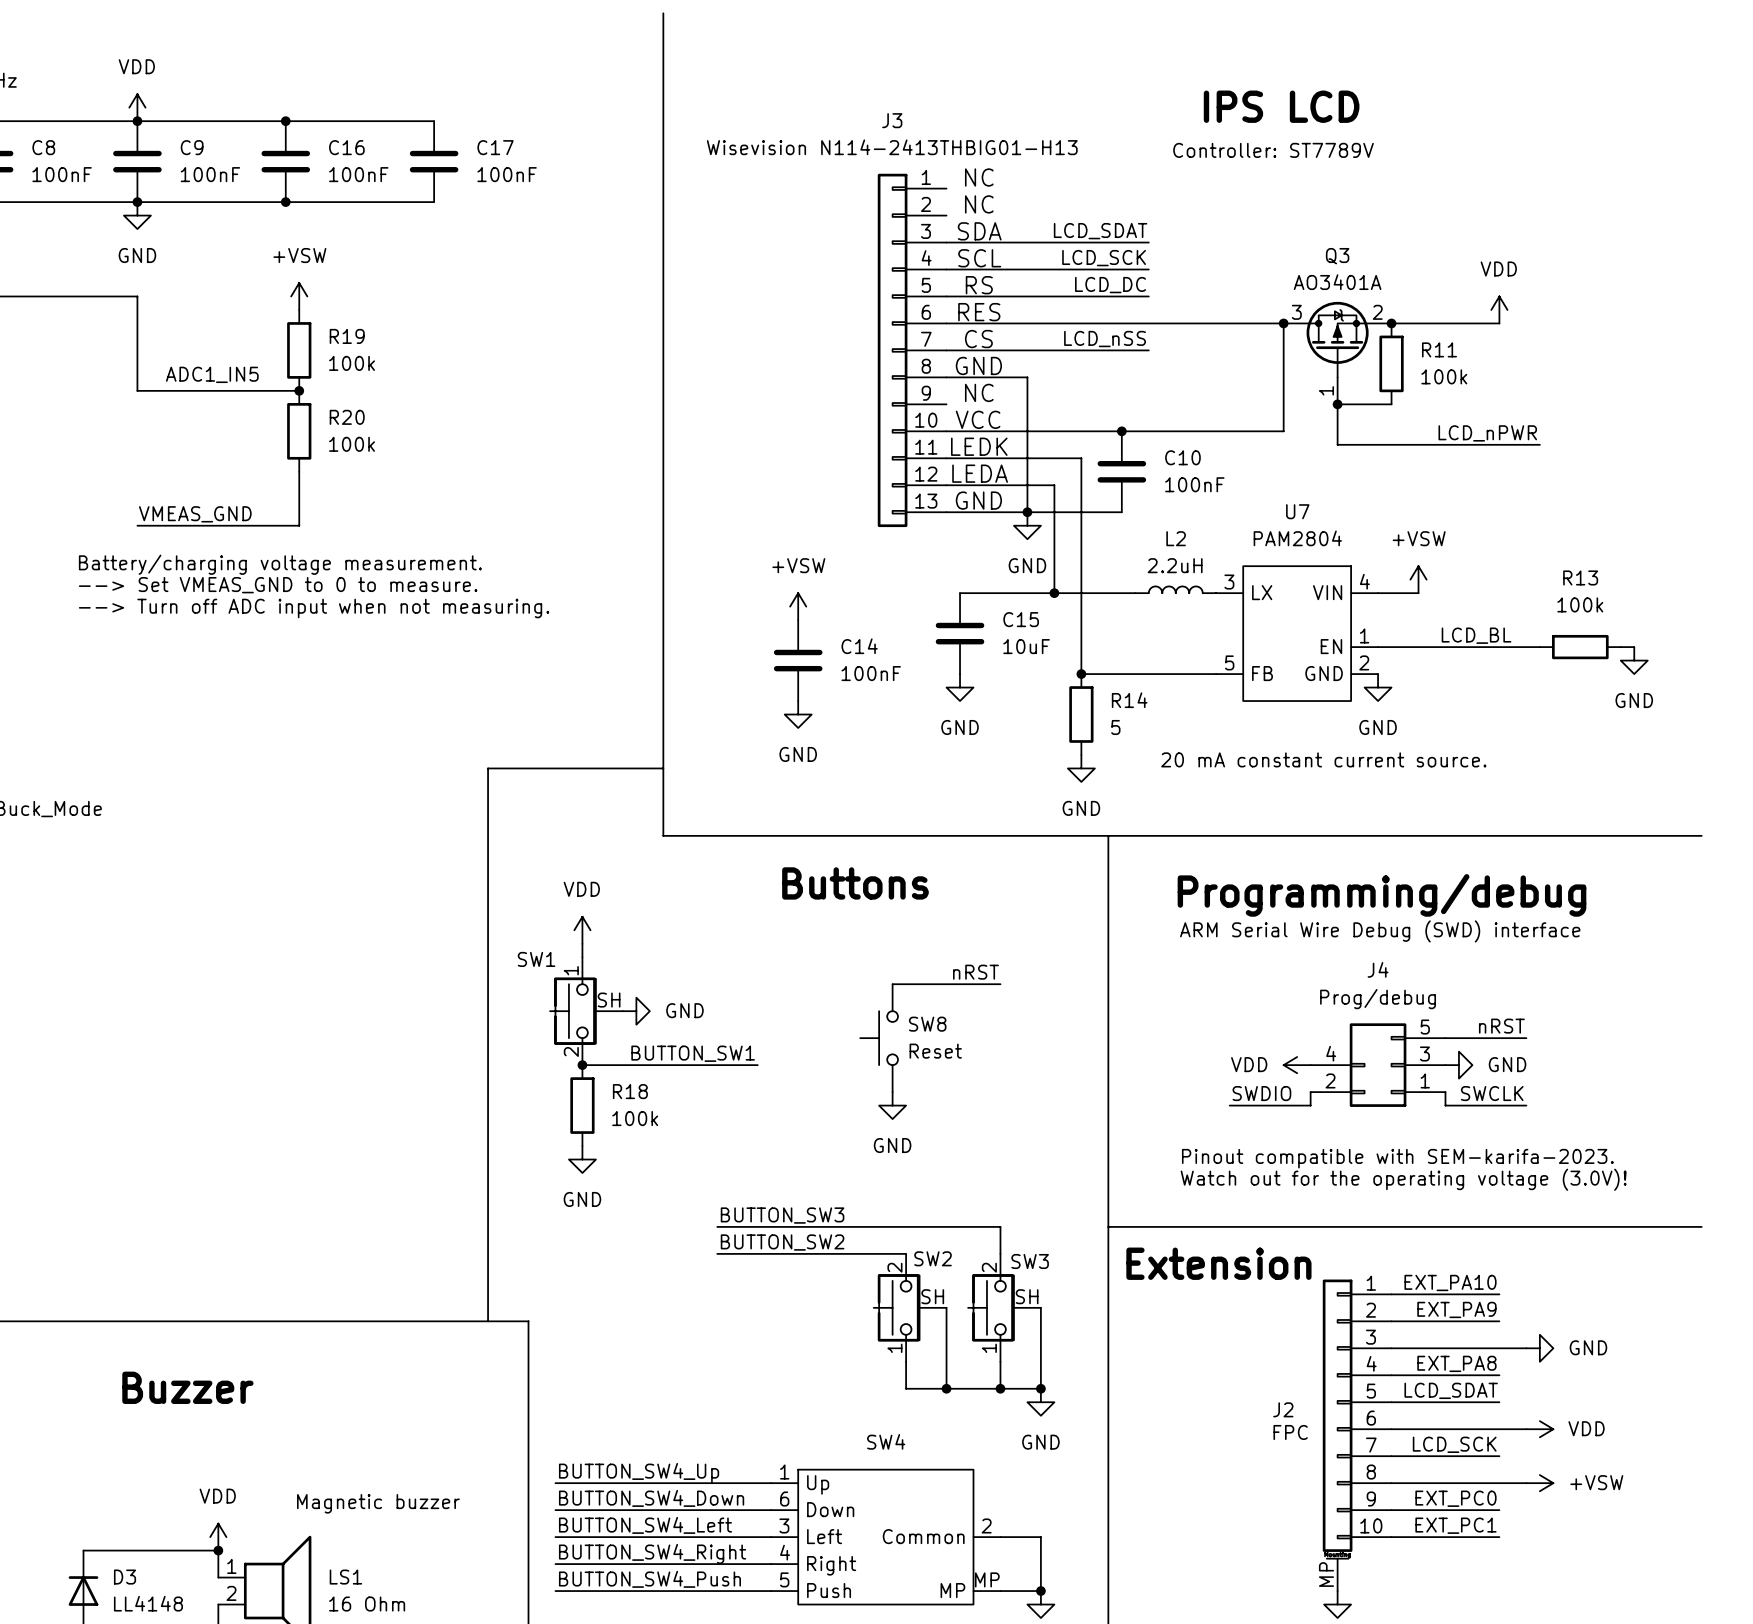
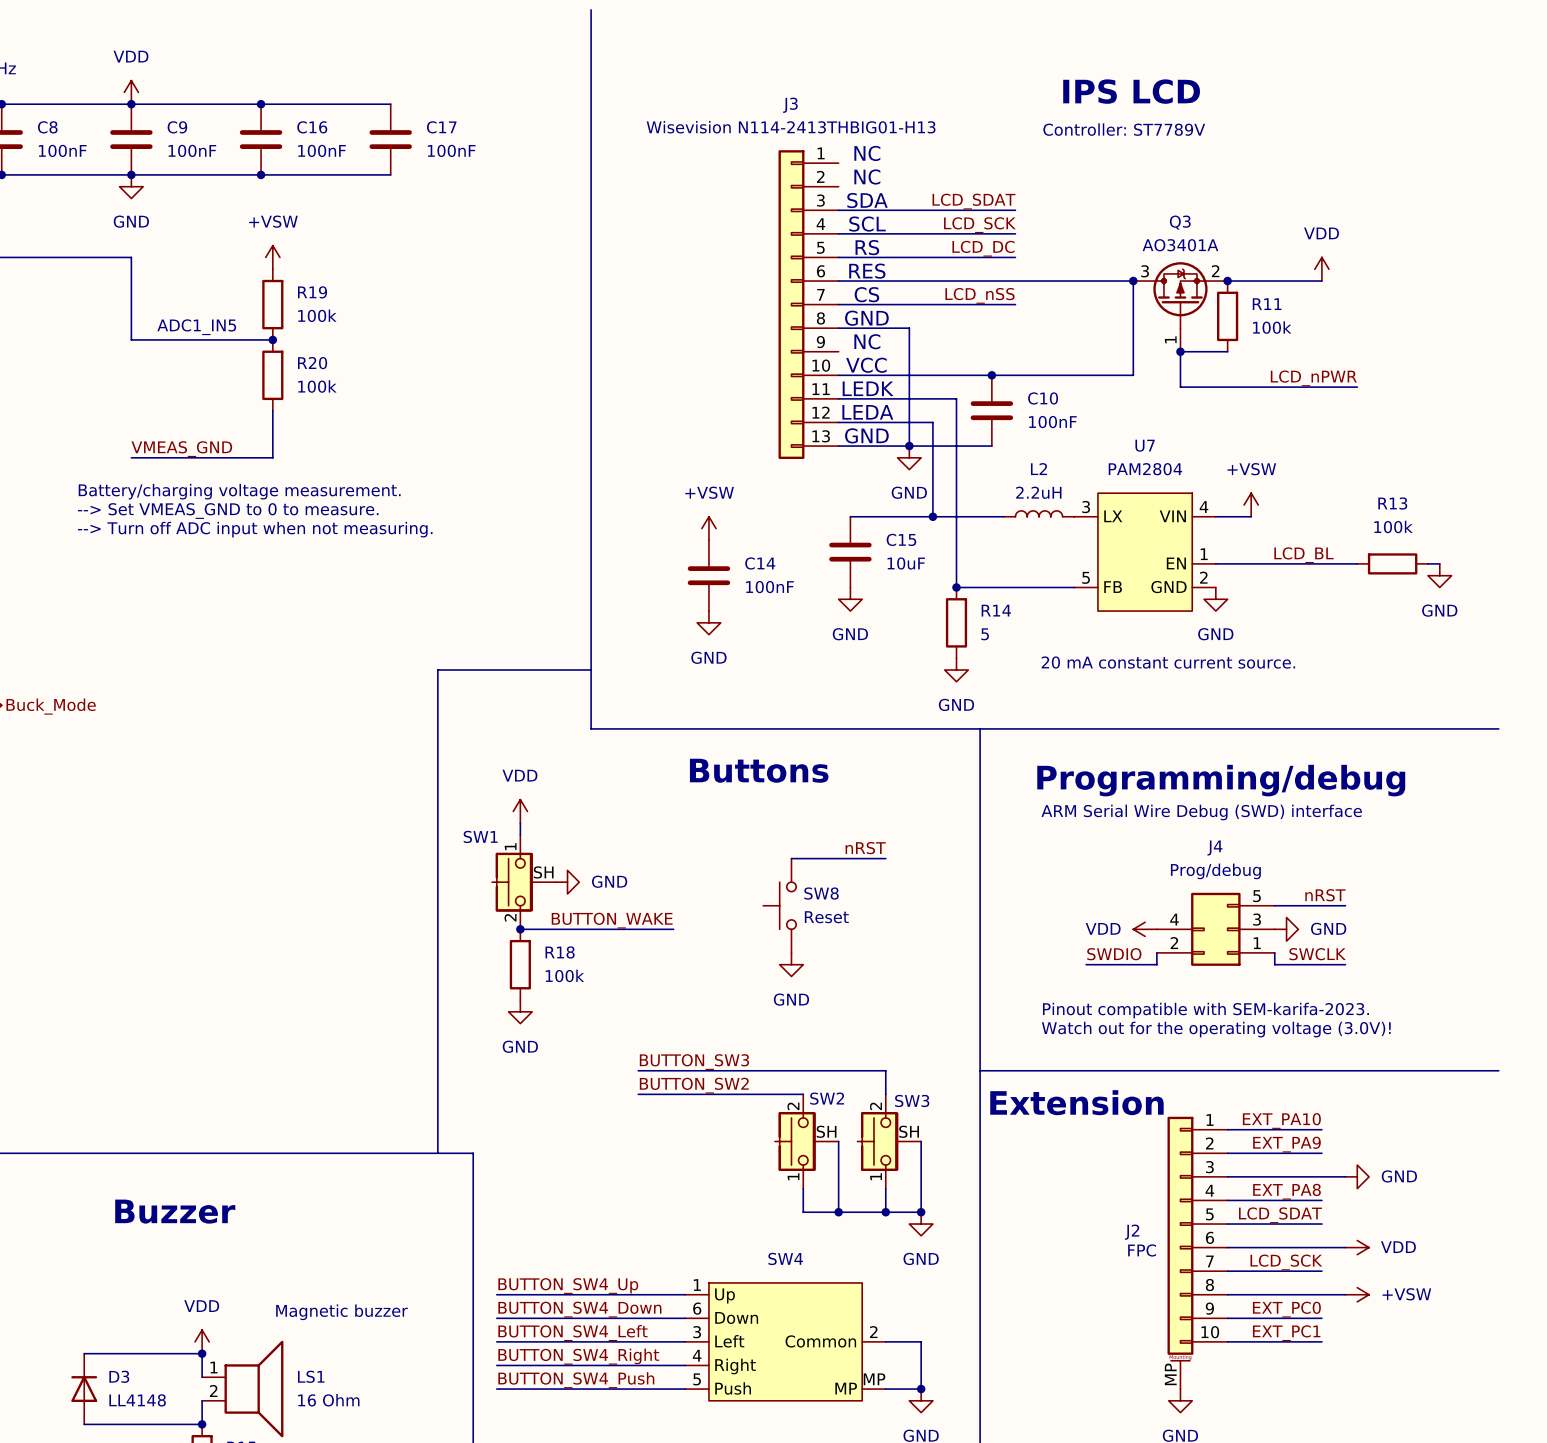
label: BUTTON_SW1 (693, 1053) -> BUTTON_WAKE (612, 920)

